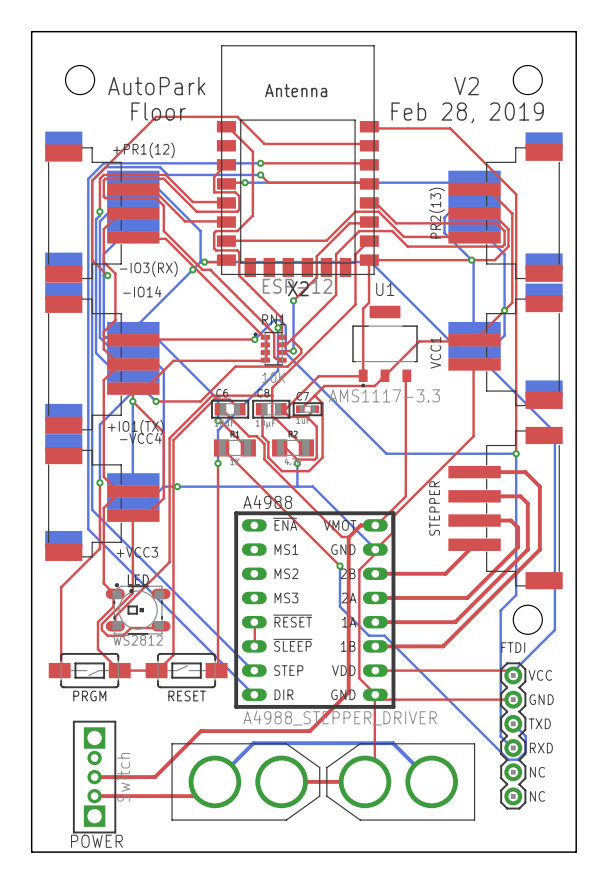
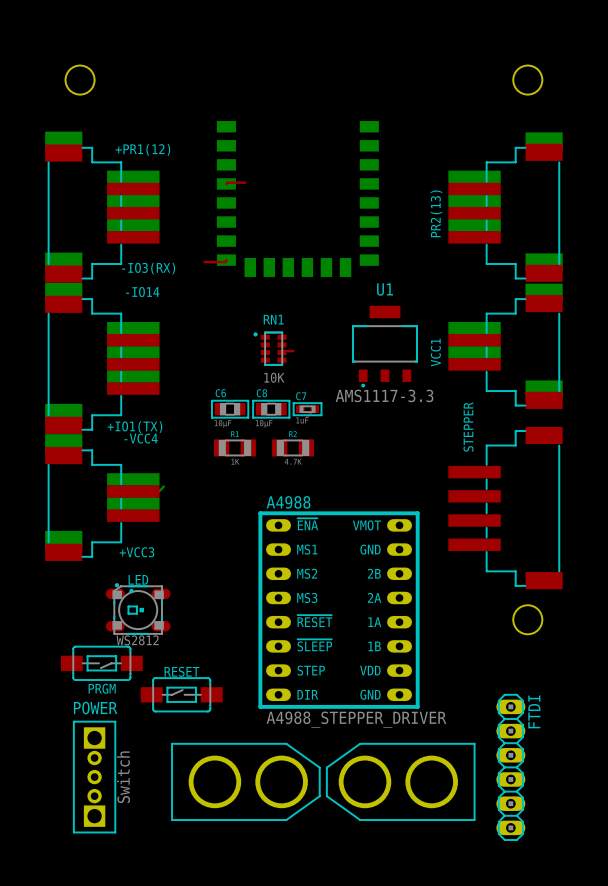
board edge: (31, 31) (576, 31) (576, 852) (31, 852) (31, 31) -> none
text: AutoPark (156, 86) -> none
text: V2 (466, 86) -> none
text: Floor (158, 111) -> none
text: Feb 28, 2019 (467, 112) -> none
top track: (226, 126) (252, 151) (252, 215) (237, 231) (216, 231) (214, 233) (214, 248) (216, 250) (237, 250) (239, 252) (239, 275) (281, 318) (282, 337) -> none
top track: (369, 126) (370, 128) (450, 128) (516, 194) (516, 453) -> none
top track: (369, 145) (369, 143) (264, 143) (237, 116) (156, 116) (92, 180) (92, 260) (107, 275) -> none
X2 side: top (297, 161) -> bottom (297, 199)
top track: (260, 163) (369, 163) (369, 164) -> none
bottom track: (260, 163) (103, 163) (88, 178) (88, 529) (254, 694) -> none
via: (260, 163) -> none
top track: (226, 164) (214, 176) (214, 192) (235, 192) (239, 196) (239, 209) (237, 211) (196, 211) (163, 178) (105, 178) (103, 180) (103, 196) (105, 198) (156, 198) (163, 205) (163, 231) (202, 269) (210, 269) (274, 333) (274, 356) (282, 360) -> none
top track: (260, 174) (268, 182) (369, 183) -> none
bottom track: (260, 174) (167, 174) (159, 167) (105, 167) (92, 180) (92, 509) (254, 670) -> none
via: (260, 174) -> none
bottom track: (133, 176) (146, 176) (200, 231) (200, 262) -> none
bottom track: (474, 176) (467, 182) (245, 182) -> none
via: (245, 182) -> none
top track: (133, 188) (154, 190) (185, 221) (226, 222) -> none
top track: (474, 188) (489, 190) (512, 213) (512, 302) (473, 341) (419, 341) (374, 385) (324, 385) (300, 409) -> none
bottom track: (133, 201) (119, 202) (99, 221) (99, 337) (113, 351) (146, 353) (163, 370) (163, 486) (312, 486) (375, 549) -> none
bottom track: (474, 201) (460, 202) (444, 217) (444, 233) (473, 262) (474, 328) -> none
top track: (226, 202) (192, 202) (165, 174) (103, 174) (99, 178) (99, 211) -> none
top track: (369, 202) (376, 203) (396, 223) (496, 223) (504, 231) (504, 244) (502, 246) (407, 246) (392, 231) (359, 231) (336, 254) (336, 294) (287, 343) (282, 344) -> none
bottom track: (99, 211) (99, 215) (96, 219) (96, 353) (119, 376) (133, 376) -> none
via: (99, 211) -> none
top track: (133, 213) (119, 213) (103, 229) (103, 262) (115, 273) (115, 320) (103, 331) (103, 349) (119, 364) -> none
top track: (474, 213) (492, 213) (508, 229) (508, 246) (494, 260) (369, 260) (369, 302) (363, 308) (363, 375) (318, 376) (283, 411) (280, 409) (289, 416) (307, 416) (316, 426) (316, 457) (314, 459) (297, 459) -> none
top track: (369, 222) (349, 223) (316, 256) (316, 277) (293, 300) -> none
bottom track: (133, 225) (103, 254) (103, 335) (105, 337) (156, 337) (218, 399) (218, 420) -> none
bottom track: (474, 225) (504, 254) (504, 335) (489, 351) -> none
top track: (133, 237) (165, 238) (266, 337) (266, 358) (264, 360) (173, 360) (146, 387) (134, 387) (132, 389) (132, 401) (163, 432) (163, 498) (146, 515) (132, 515) (132, 593) (101, 624) (101, 629) (107, 635) (123, 635) (130, 627) (159, 627) (161, 626) -> none
top track: (474, 237) (403, 236) (378, 211) (355, 211) (326, 240) (226, 241) -> none
top track: (369, 241) (355, 254) (355, 304) (272, 387) (272, 416) (306, 447) -> none
via: (471, 260) -> none
bottom track: (200, 262) (370, 262) (460, 351) (474, 352) -> none
bottom track: (200, 262) (133, 328) -> none
via: (204, 262) -> none
via: (192, 269) -> none
via: (107, 275) -> none
bottom track: (293, 300) (293, 351) -> none
via: (293, 300) -> none
via: (504, 310) -> none
bottom track: (278, 327) (278, 370) (218, 430) (218, 463) -> none
via: (278, 327) -> none
top track: (254, 339) (133, 340) -> none
bottom track: (254, 339) (274, 320) (279, 320) (285, 325) (285, 353) (386, 453) (516, 453) (516, 595) (500, 610) (500, 736) (513, 748) -> none
via: (254, 339) -> none
top track: (291, 339) (301, 349) (301, 353) (287, 366) (235, 366) (200, 401) (156, 401) -> none
via: (293, 351) -> none
bottom track: (489, 351) (489, 366) (554, 432) (554, 629) (514, 670) (513, 675) -> none
top track: (119, 364) (103, 380) (103, 476) (119, 492) -> none
top track: (474, 364) (473, 436) (392, 517) (392, 533) (375, 549) (374, 554) (359, 569) (359, 678) (375, 694) -> none
top track: (406, 375) (405, 496) (376, 525) (360, 525) (348, 537) -> none
top track: (272, 395) (212, 395) (169, 438) (169, 562) (115, 616) (115, 626) -> none
top track: (314, 395) (322, 403) (322, 457) (309, 471) (281, 471) (268, 457) (268, 442) (262, 436) (261, 409) -> none
bottom track: (132, 401) (133, 479) -> none
via: (132, 401) -> none
bottom track: (156, 401) (148, 393) (130, 393) (99, 424) (99, 482) -> none
via: (156, 401) -> none
top track: (220, 409) (249, 436) (256, 436) (264, 444) (264, 459) (341, 536) (348, 537) -> none
top track: (239, 409) (229, 399) (214, 399) (173, 440) (173, 655) (158, 670) (119, 670) (97, 649) (97, 622) (113, 606) (113, 595) (115, 593) (103, 583) (103, 507) (119, 492) -> none
top track: (218, 420) (248, 447) -> none
via: (218, 420) -> none
top track: (221, 447) (339, 566) -> none
top track: (279, 447) (285, 447) (297, 459) -> none
via: (516, 453) -> none
top track: (218, 463) (216, 670) -> none
via: (218, 463) -> none
bottom track: (297, 463) (297, 486) -> none
via: (297, 463) -> none
top track: (474, 472) (525, 472) (539, 486) (539, 549) (443, 646) (375, 646) -> none
top track: (99, 482) (99, 548) (61, 587) (59, 670) -> none
via: (99, 482) -> none
via: (177, 486) -> none
top track: (474, 496) (520, 496) (527, 503) (527, 549) (455, 622) (375, 622) -> none
STEPPER name position: STEPPER (434, 508) -> STEPPER (468, 426)
top track: (474, 520) (510, 520) (518, 527) (518, 547) (467, 597) (375, 597) -> none
top track: (348, 537) (348, 692) (309, 731) (201, 731) (155, 777) (94, 777) -> none
top track: (474, 544) (445, 573) (375, 573) -> none
bottom track: (339, 566) (339, 606) (369, 635) (384, 635) (508, 759) (518, 759) (525, 751) (525, 736) (513, 723) -> none
via: (339, 566) -> none
A4988 position: (314, 610) -> (339, 610)
top track: (254, 622) (254, 646) -> none
PRGM position: (89, 670) -> (101, 663)
RESET position: (186, 670) -> (181, 694)
top track: (375, 670) (508, 670) (513, 675) -> none
top track: (375, 694) (374, 771) (364, 781) (281, 781) -> none
top track: (375, 694) (374, 699) (513, 699) -> none
RESET name position: RESET (187, 696) -> RESET (181, 671)
part: (513, 735) -> none
FTDI: none -> (510, 767)
top track: (214, 781) (200, 796) (94, 796) -> none
bottom track: (214, 781) (253, 743) (392, 743) (431, 781) -> none
POWER name position: POWER (96, 841) -> POWER (95, 708)

